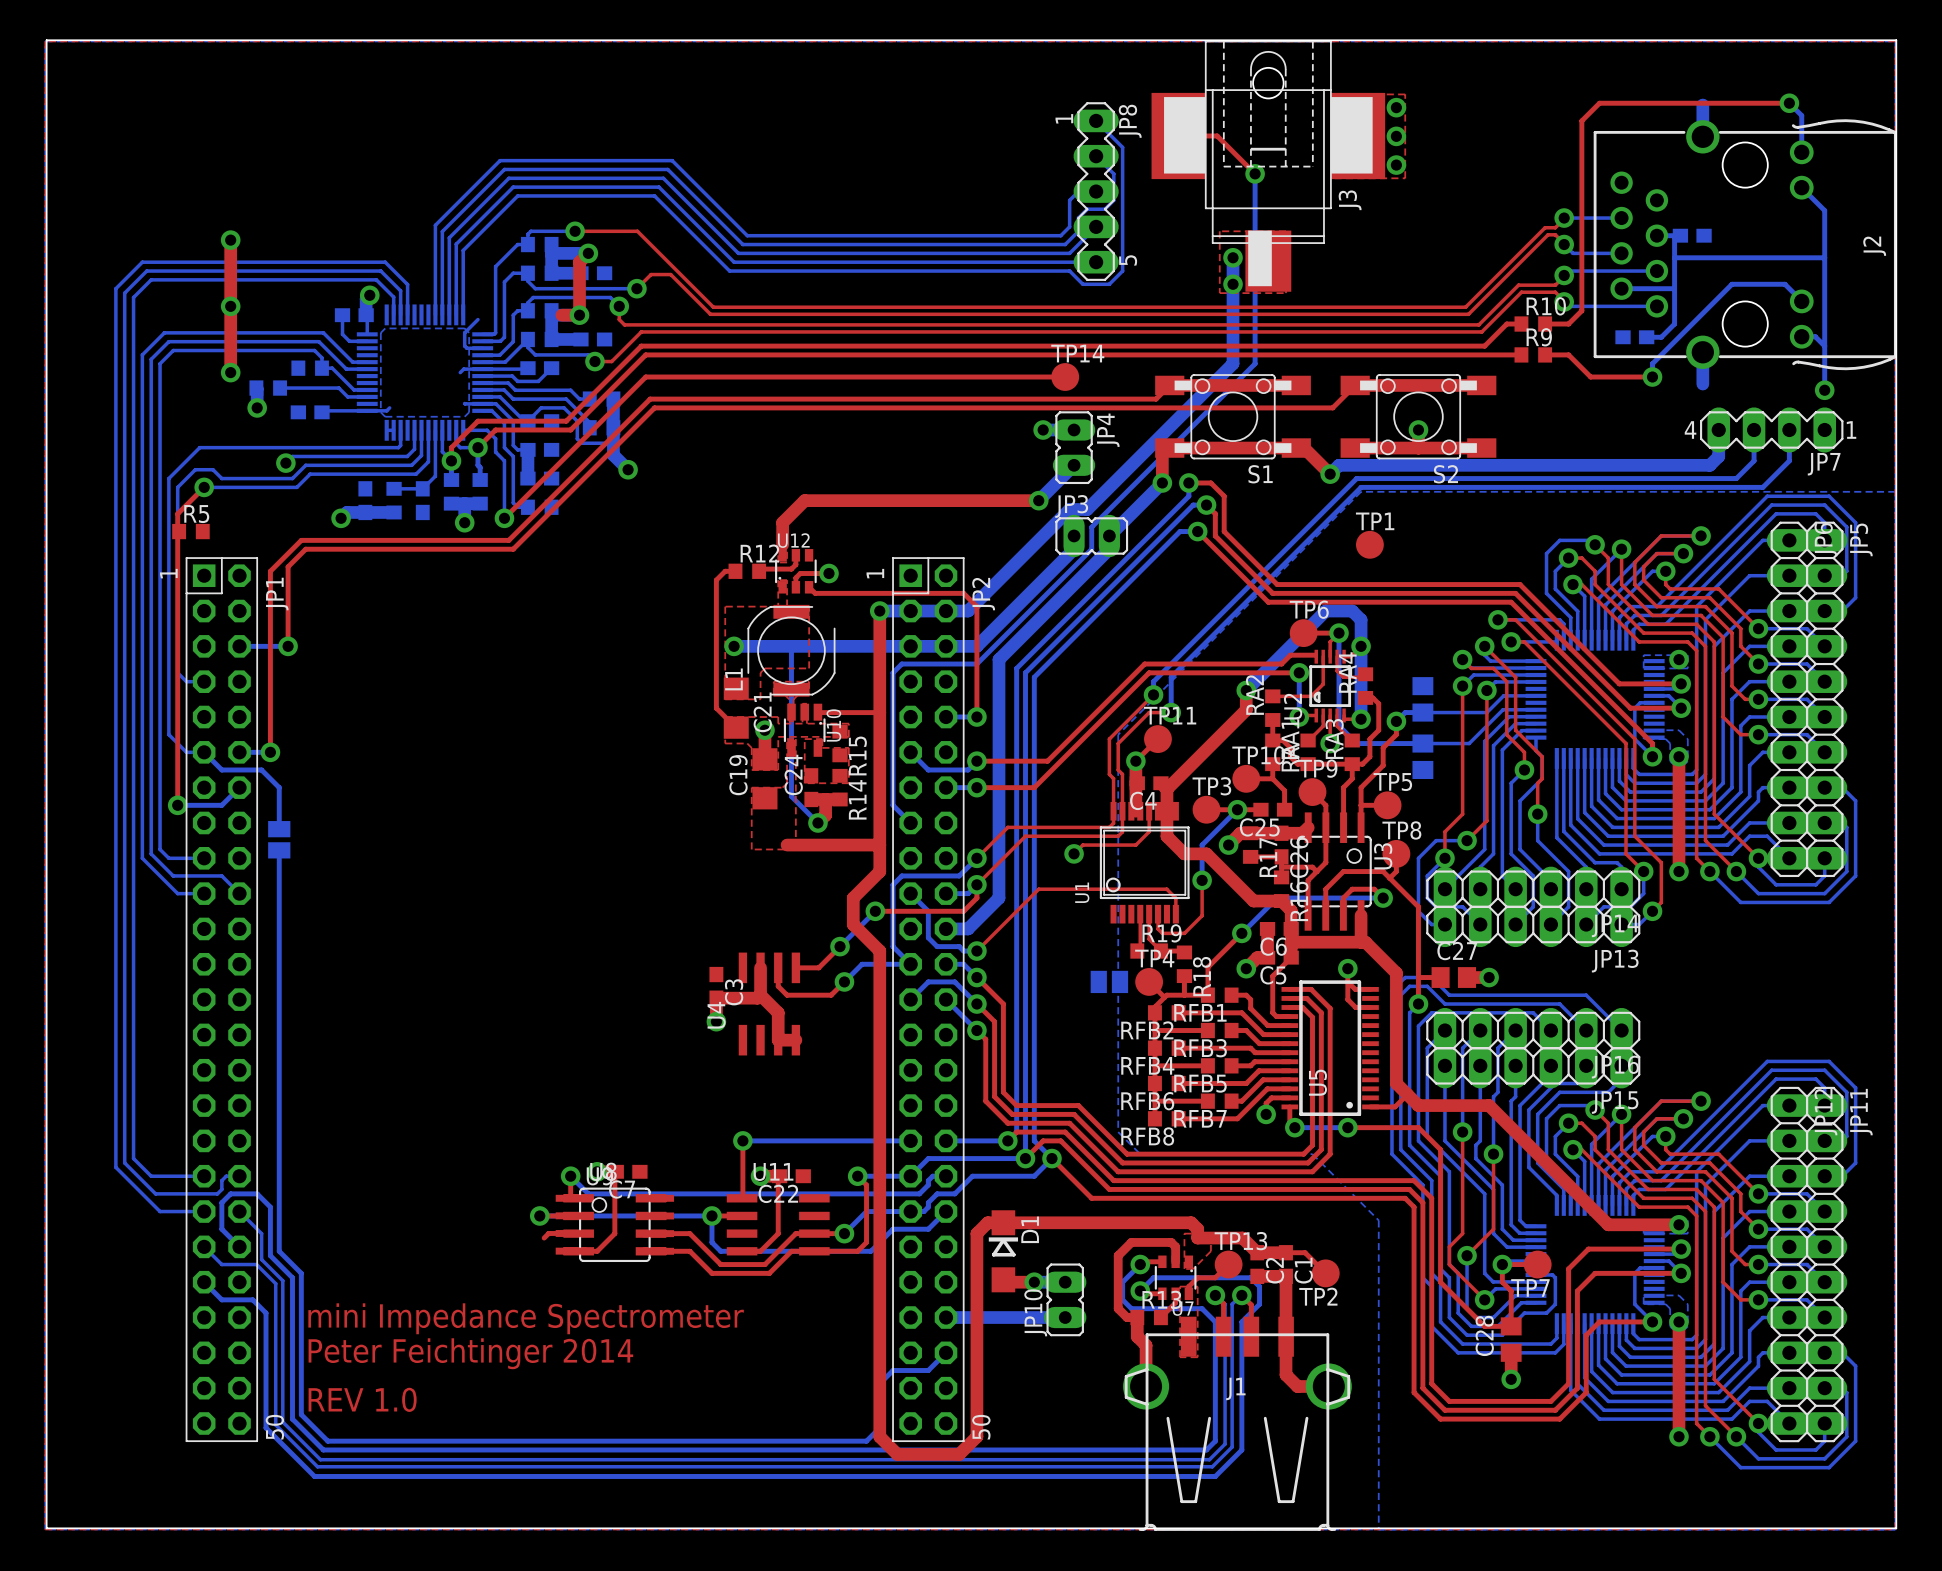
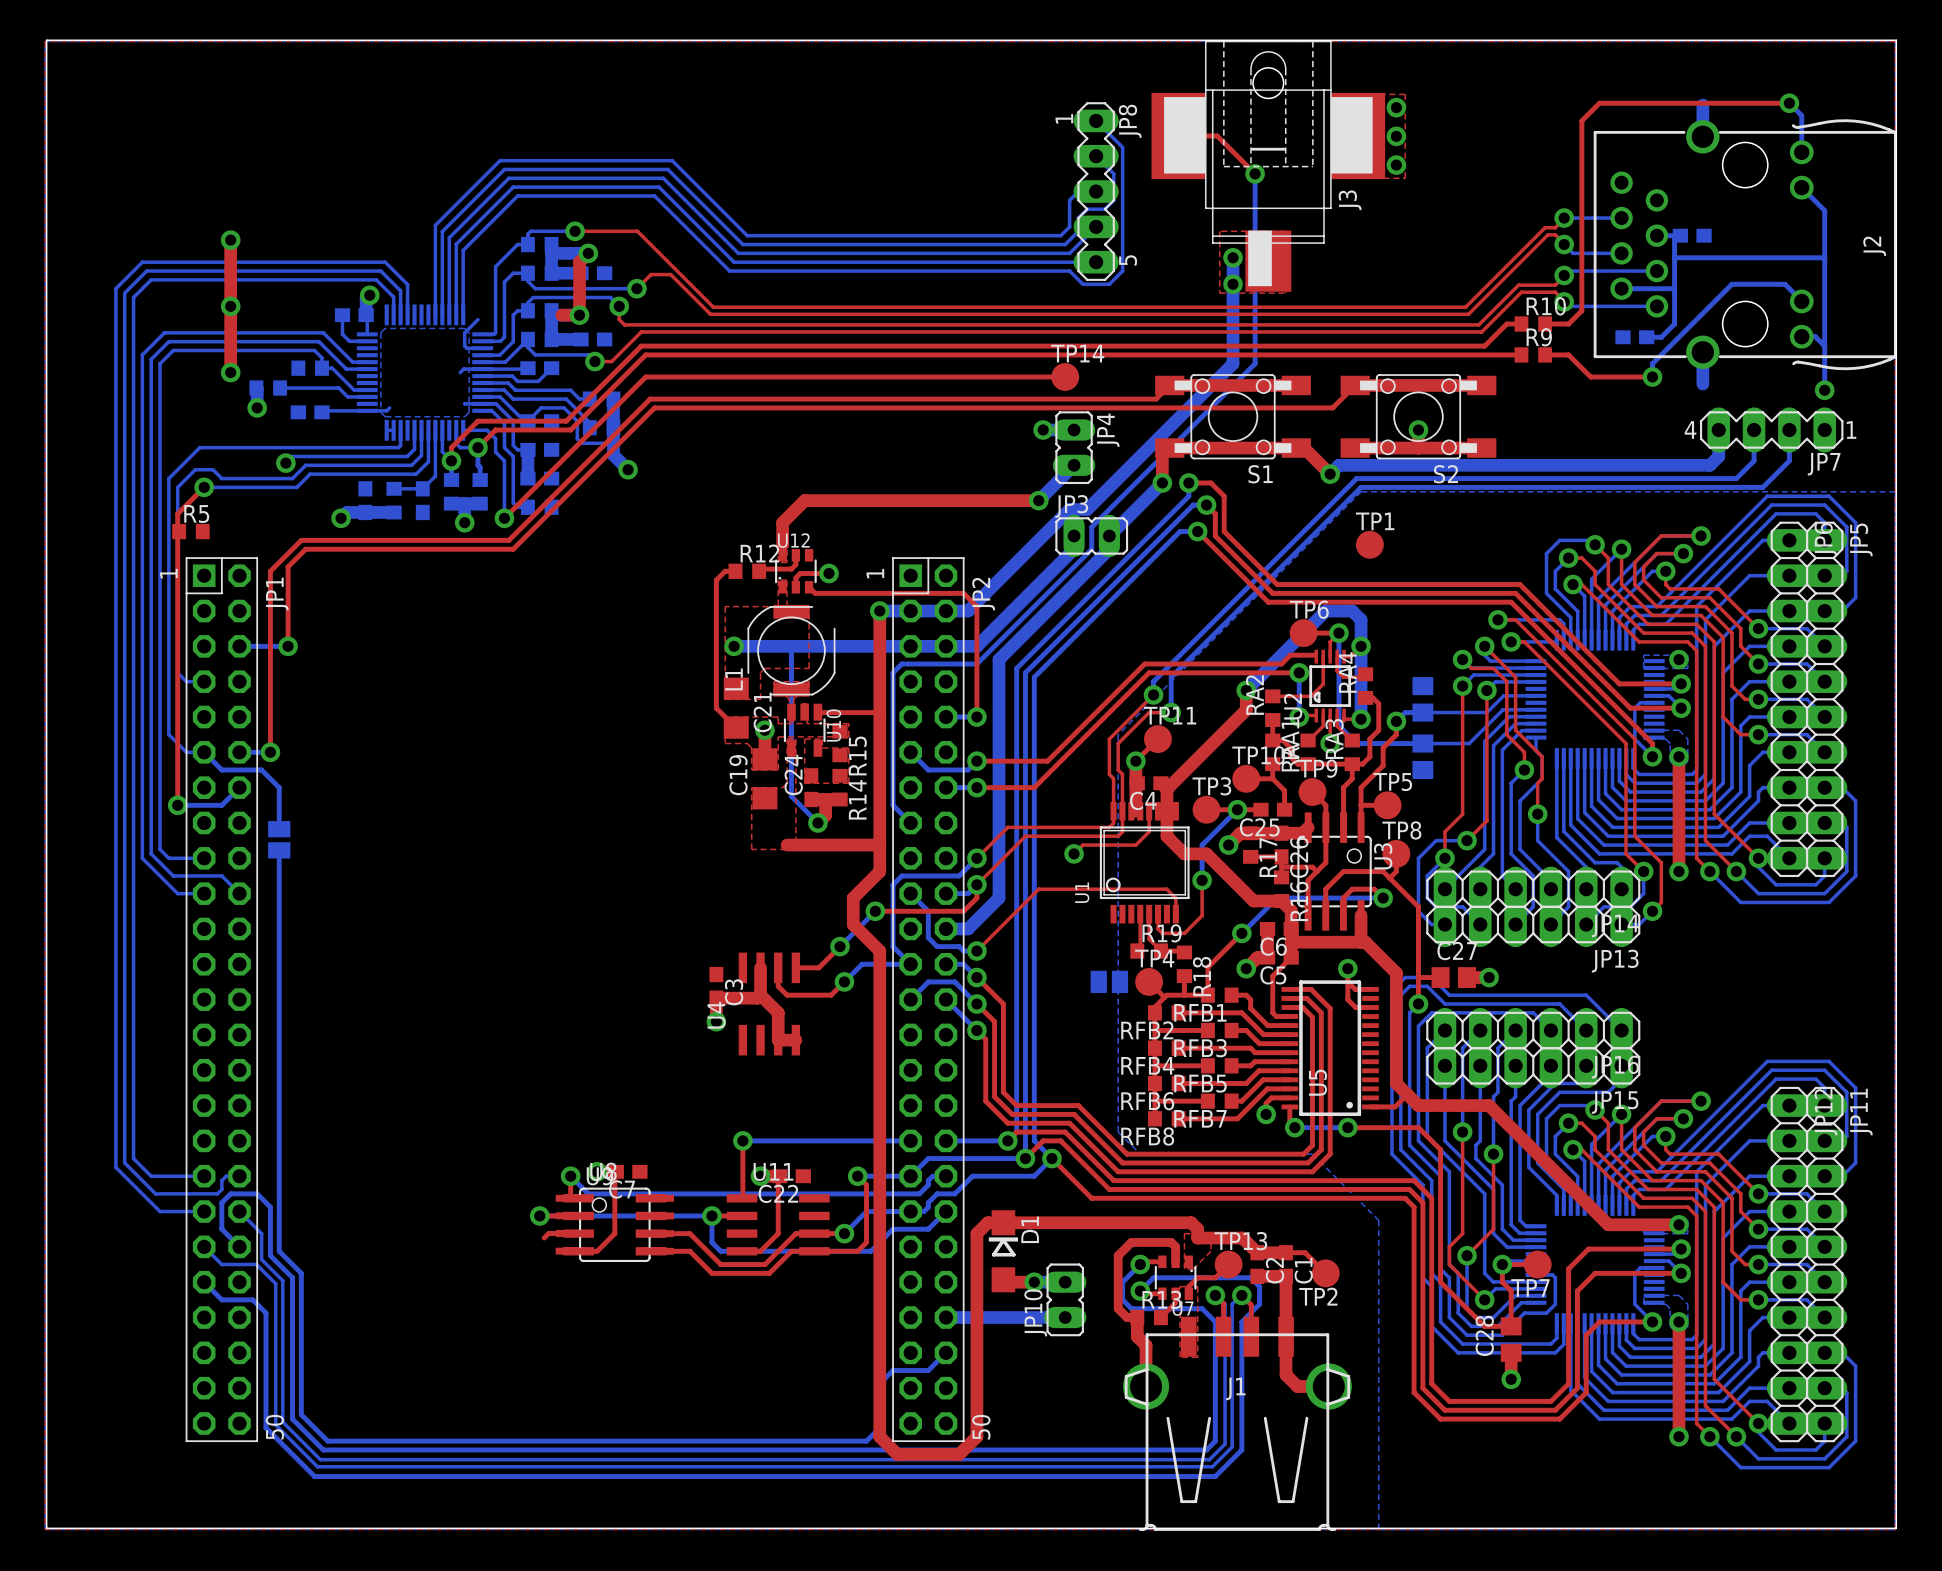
text: mini Impedance Spectrometer (526, 1318) -> none
text: Peter Feichtinger 2014 (470, 1353) -> none
text: REV 1.0 (362, 1399) -> none

